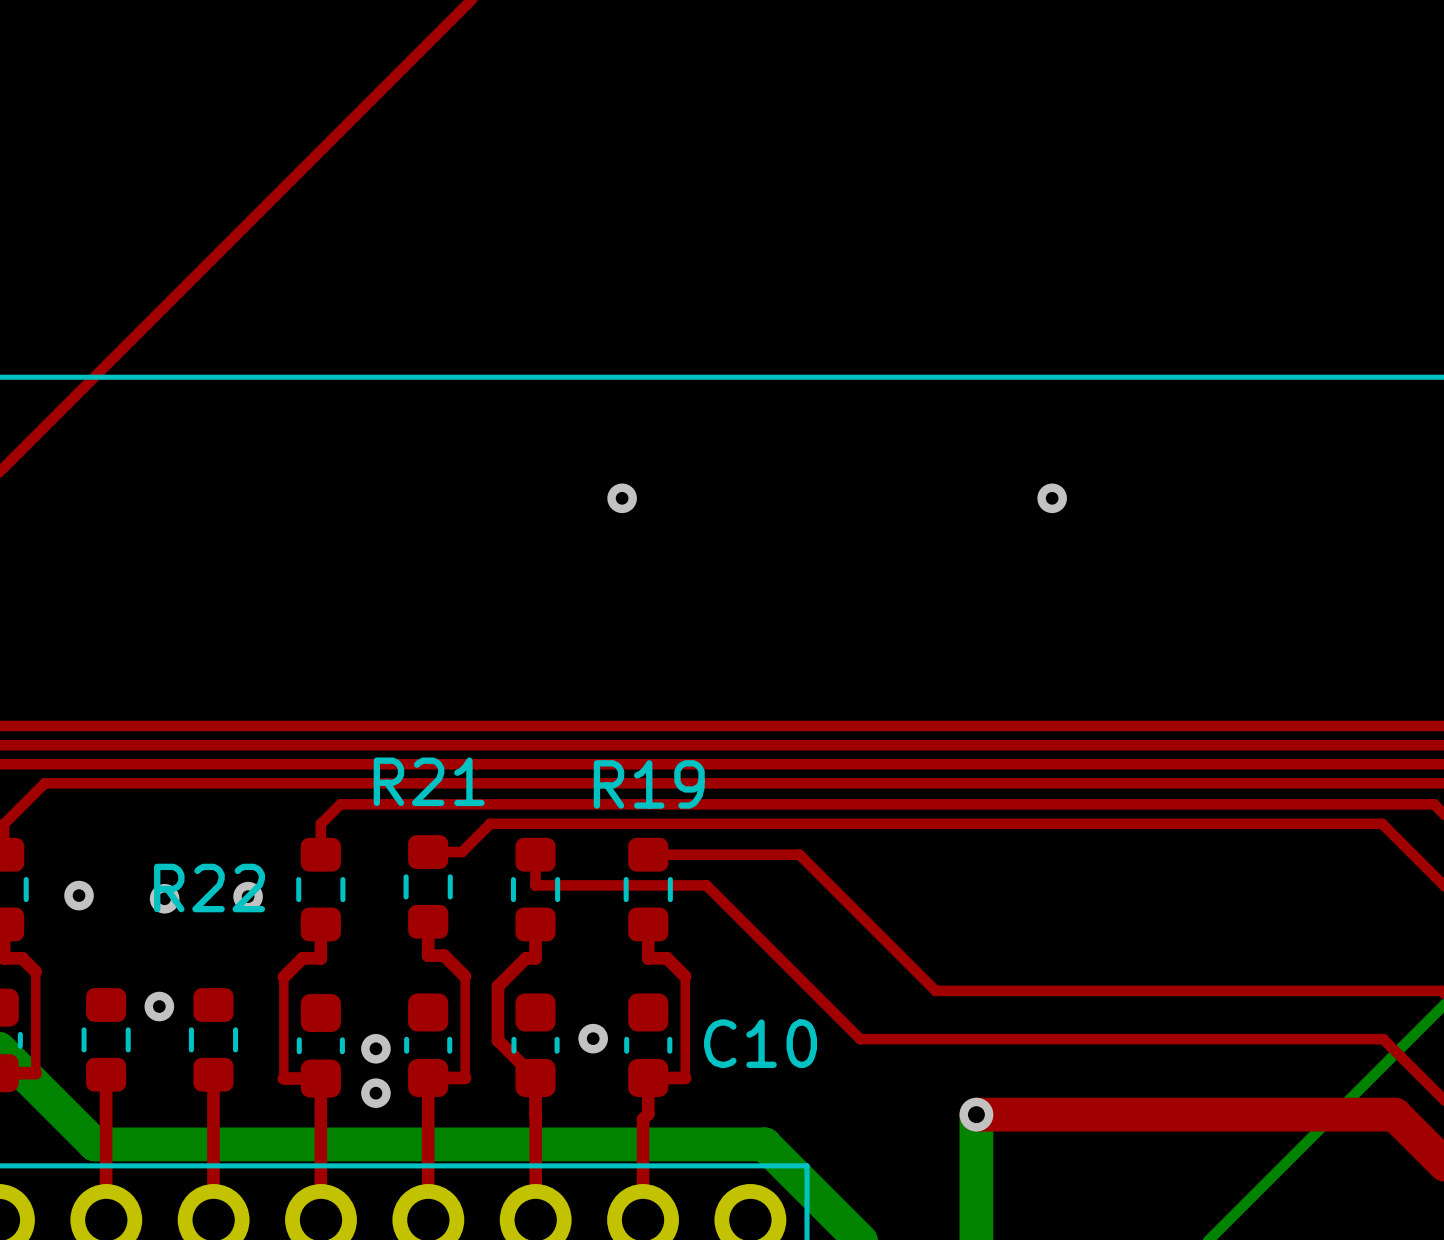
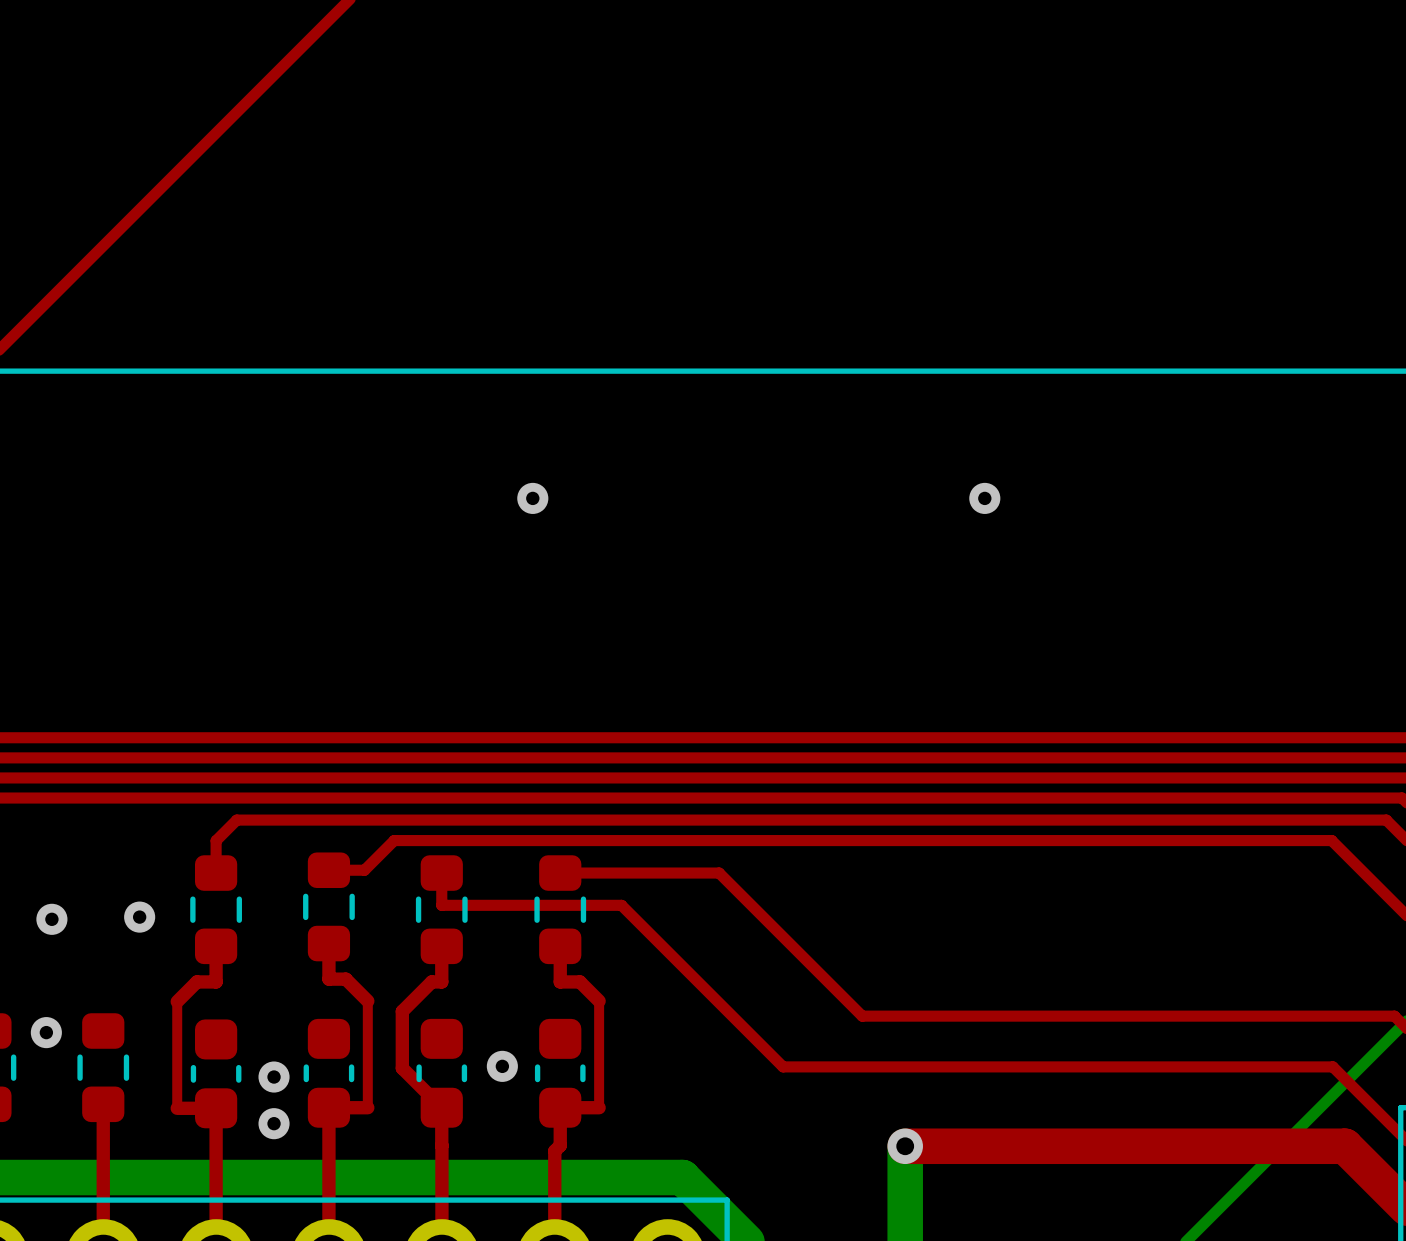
R21 name: R21 (429, 781) -> none
R19 name: R19 (649, 784) -> none
R22 name: R22 (209, 888) -> none
C10 name: C10 (760, 1043) -> none

